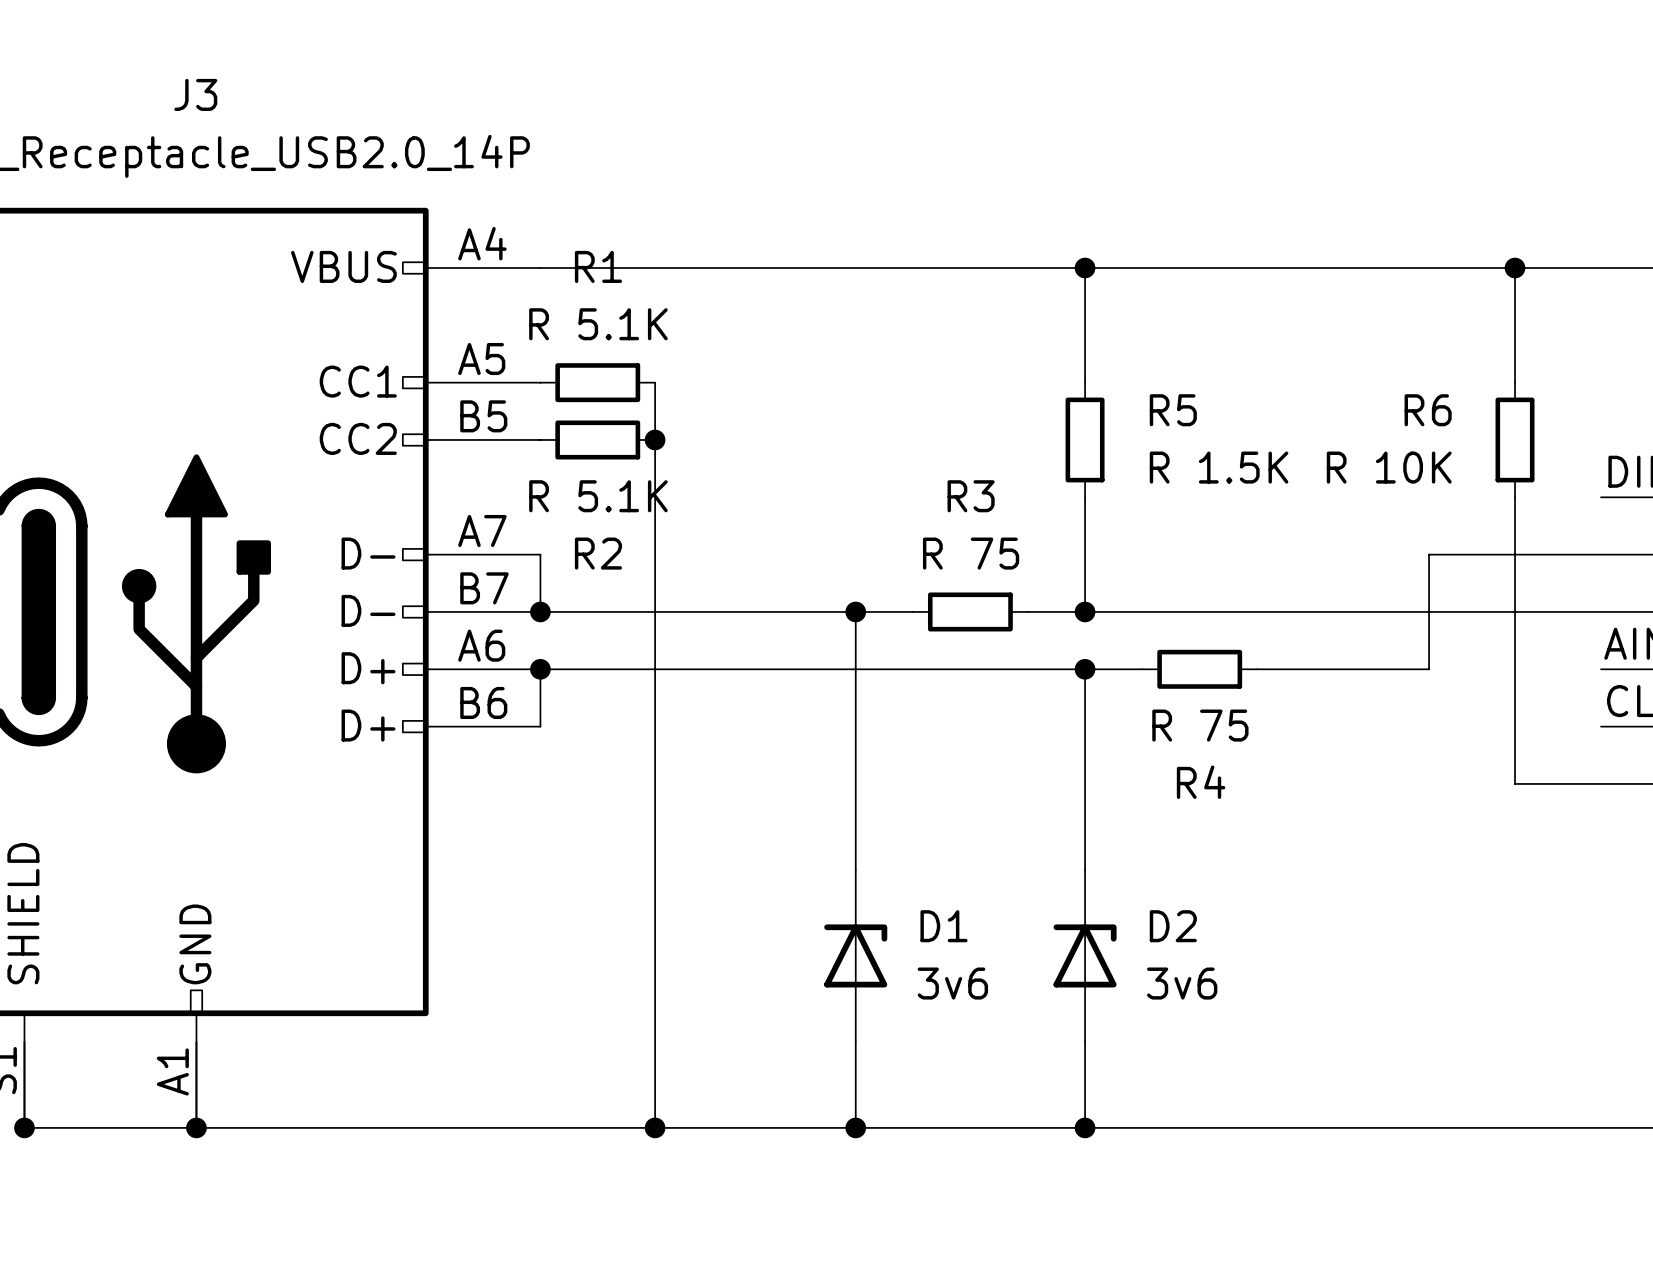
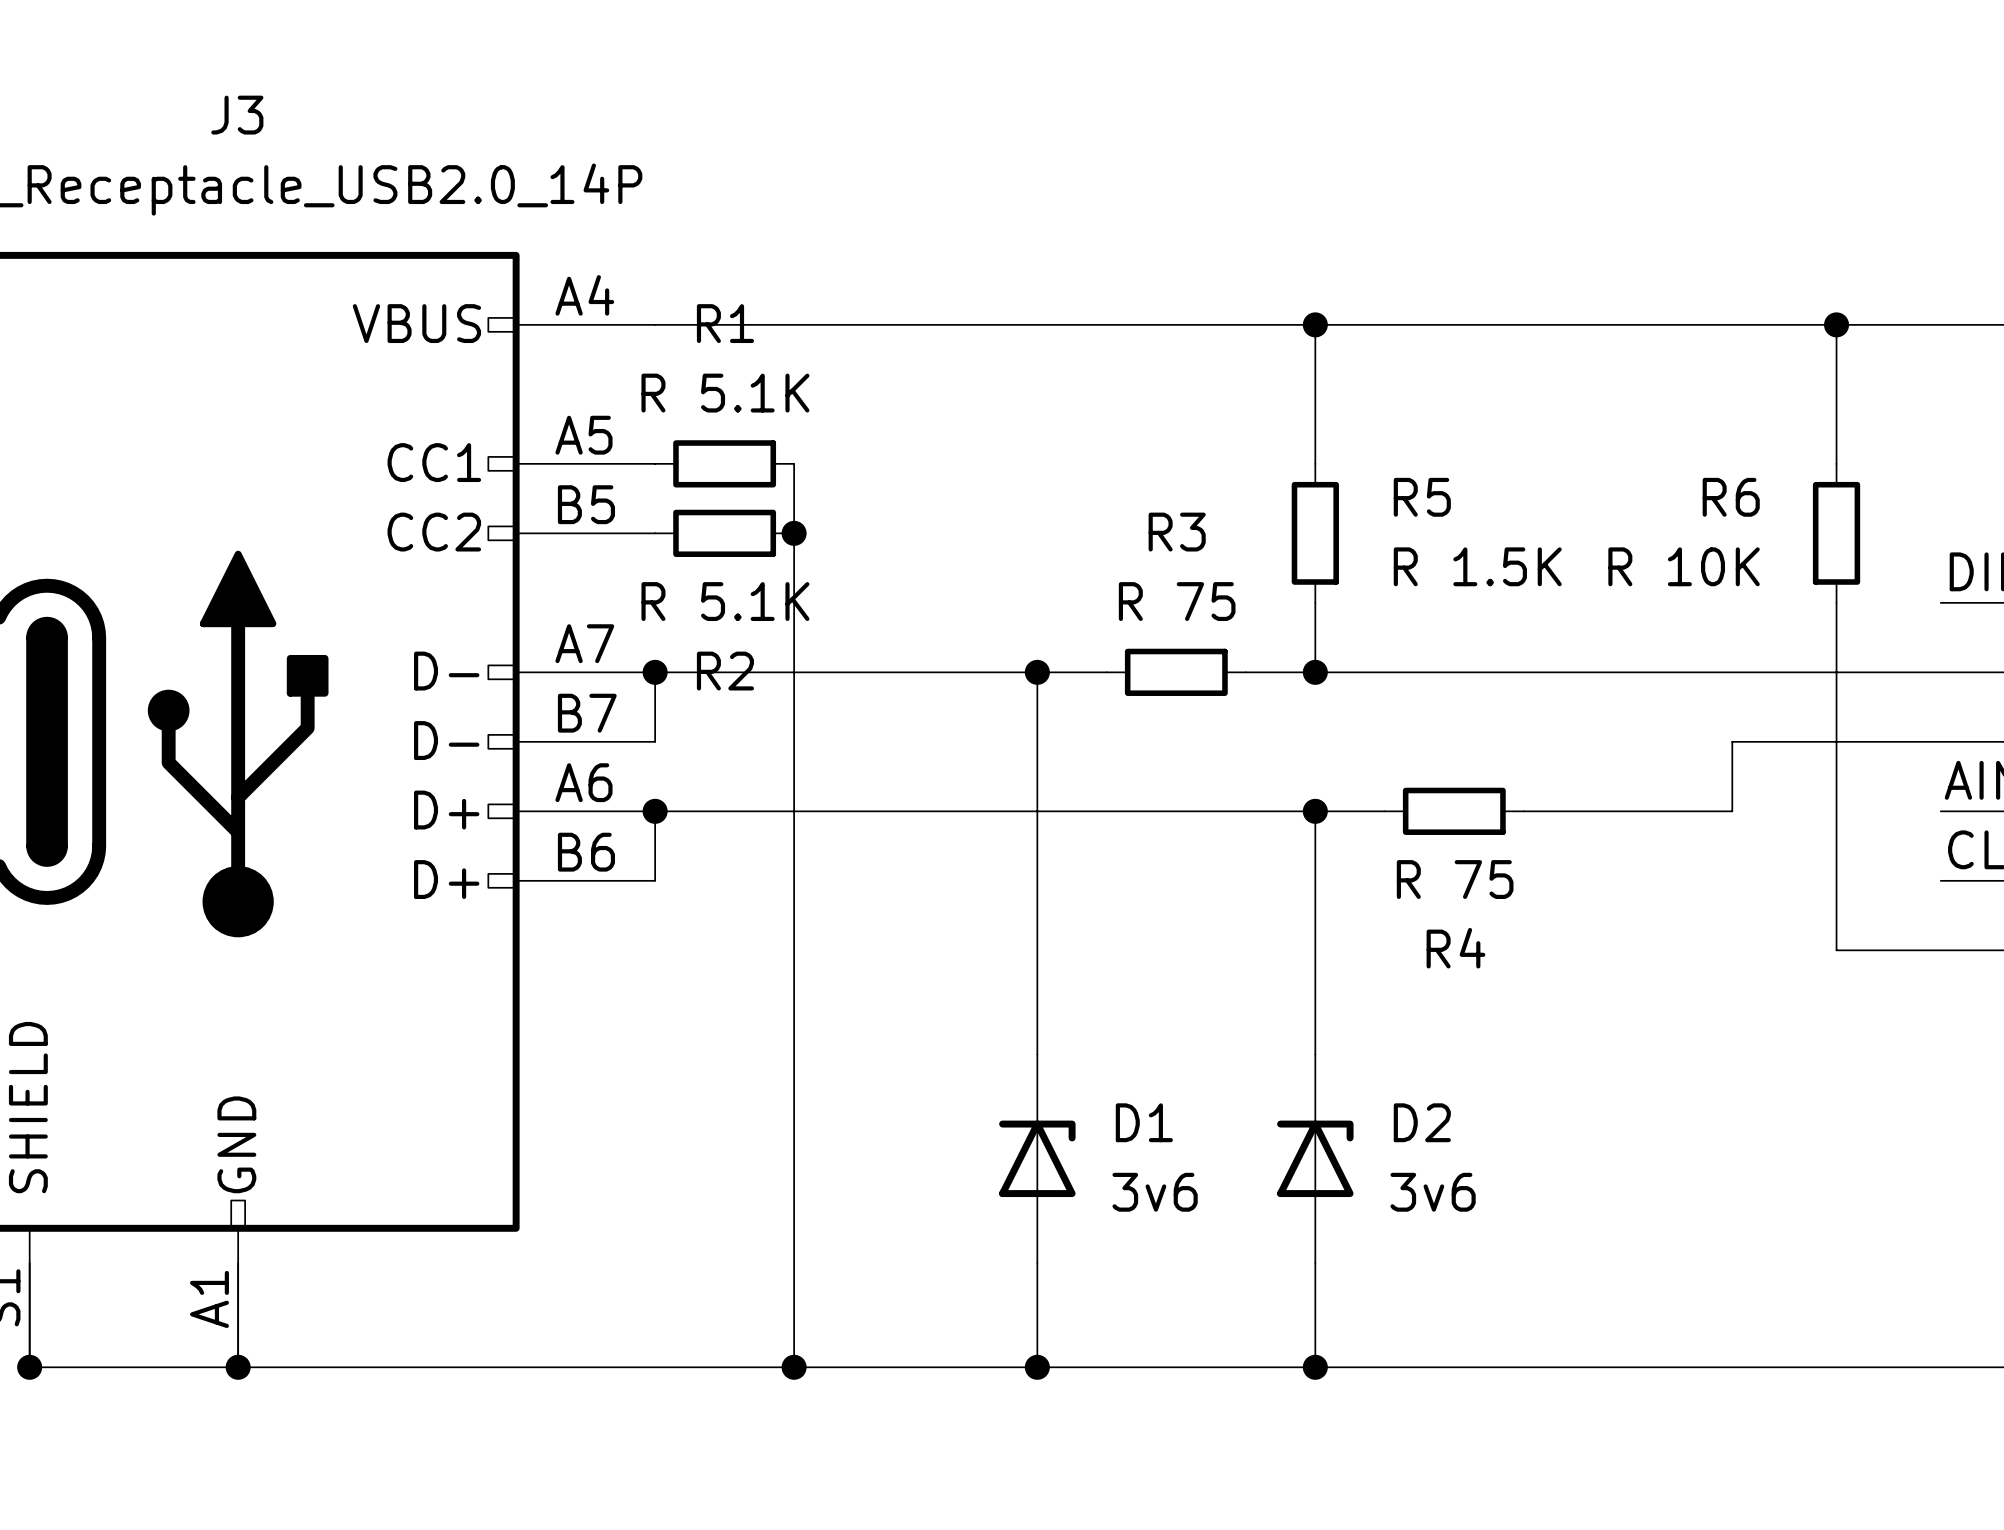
wire: (1085, 554) (1085, 611) -> (1037, 672) (1037, 741)
wire: (1429, 554) (1429, 611) (1027, 611) -> (1732, 672) (1245, 672)
wire: (540, 611) (913, 611) -> (655, 672) (1106, 672)
junction position: (540, 611) -> (655, 672)
junction position: (855, 611) -> (1037, 672)
R3 position: (970, 611) -> (1176, 672)
junction position: (1085, 611) -> (1315, 672)

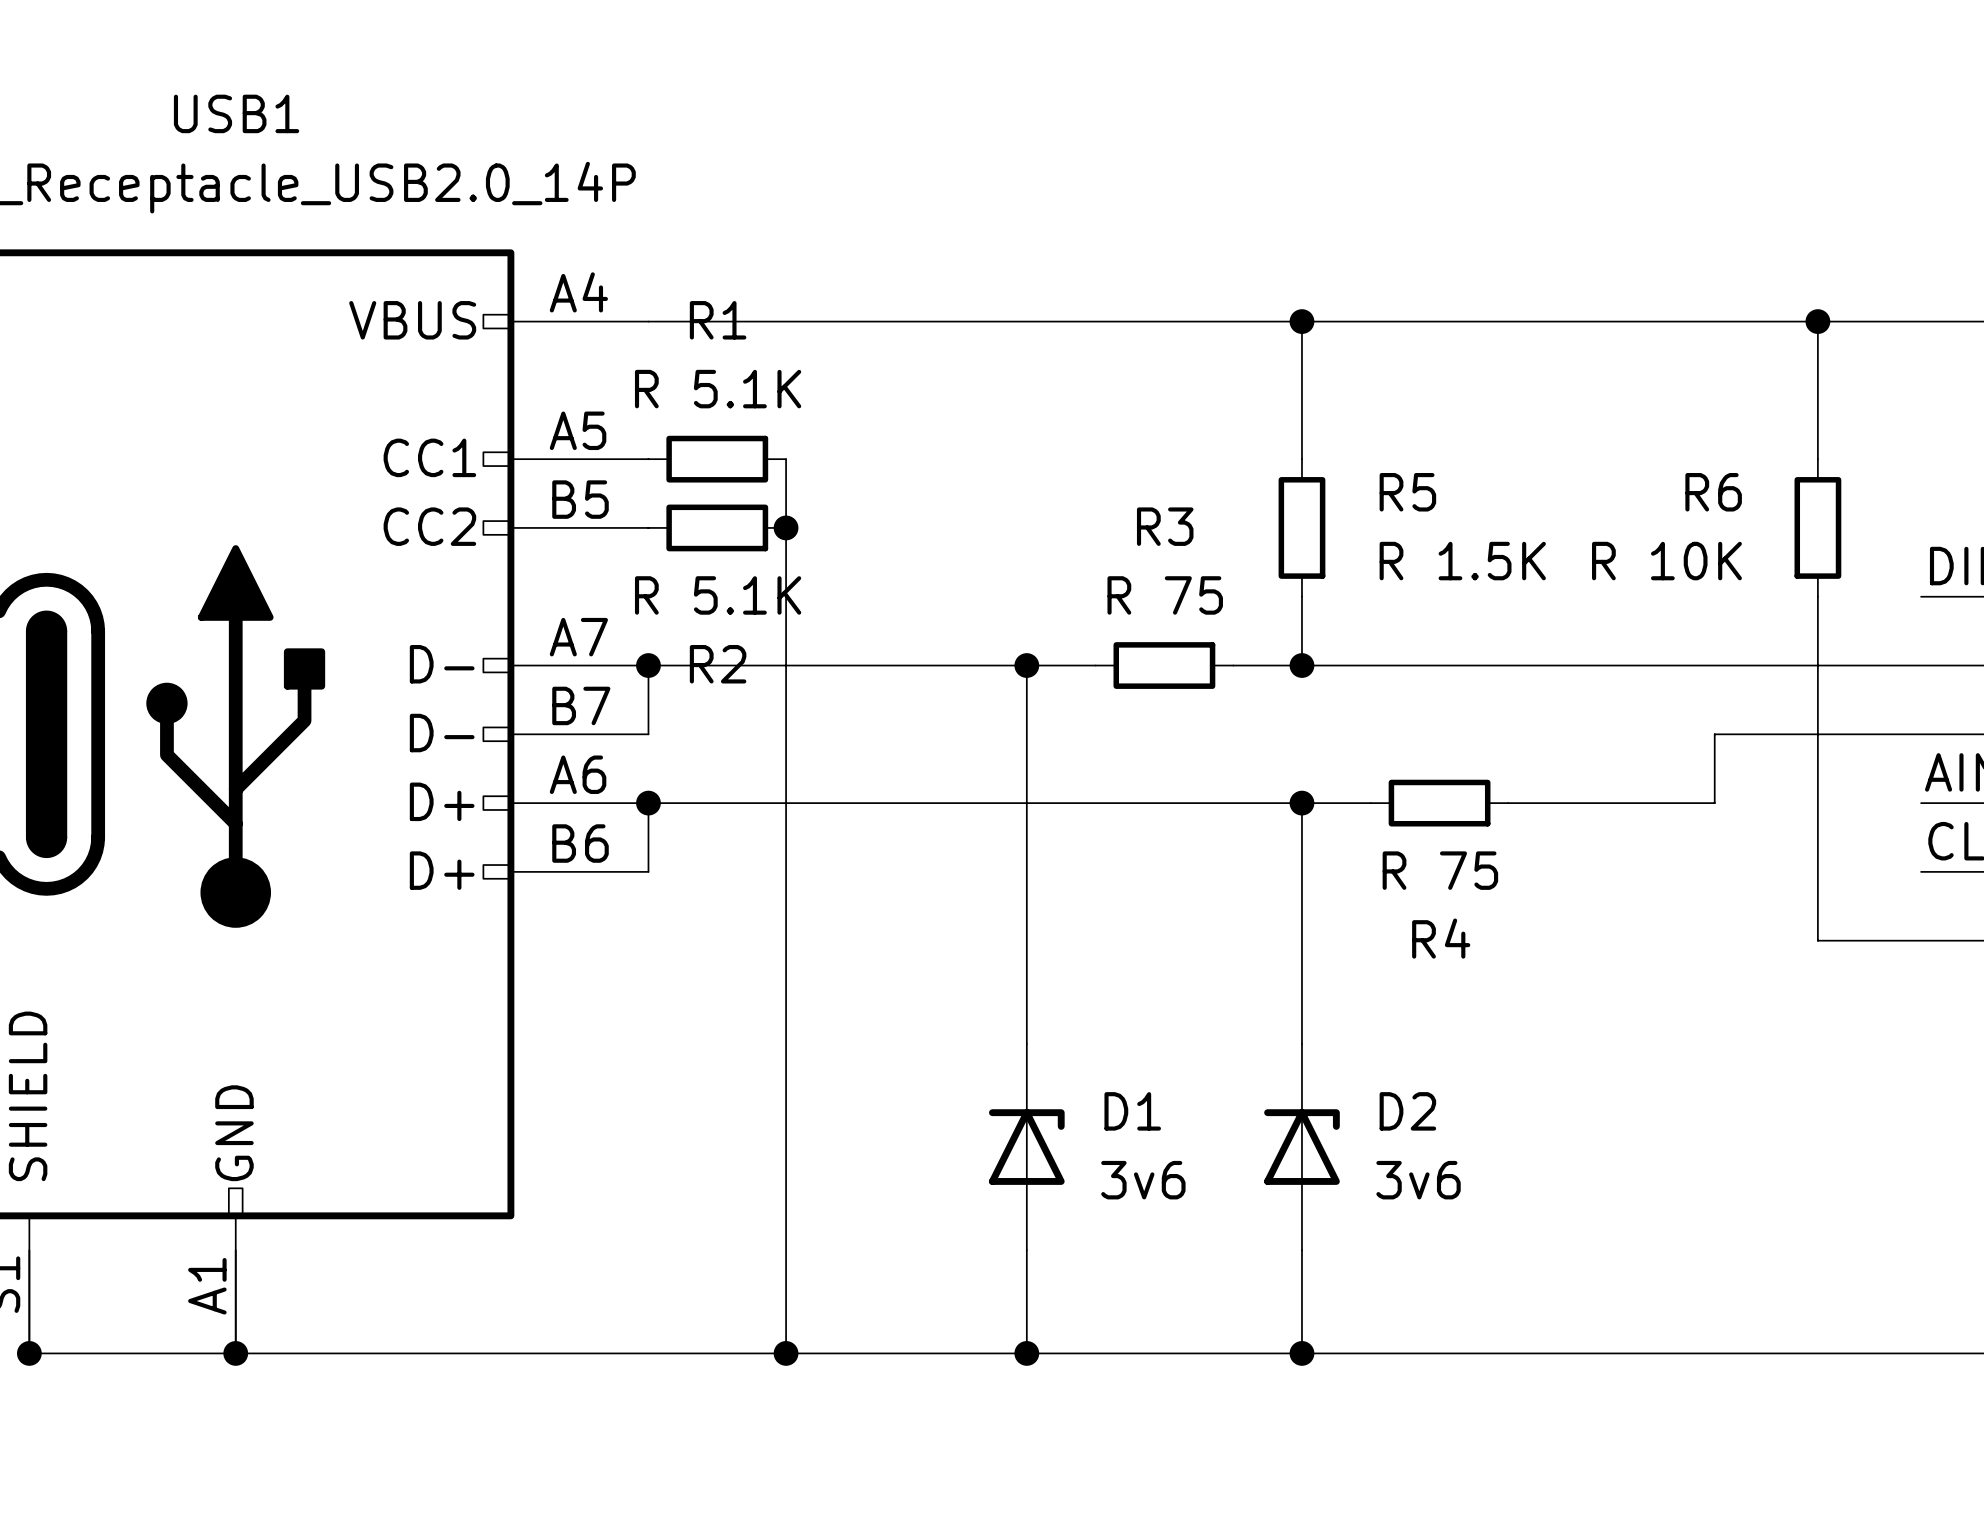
J3 name: J3 (237, 115) -> USB1 (236, 113)

